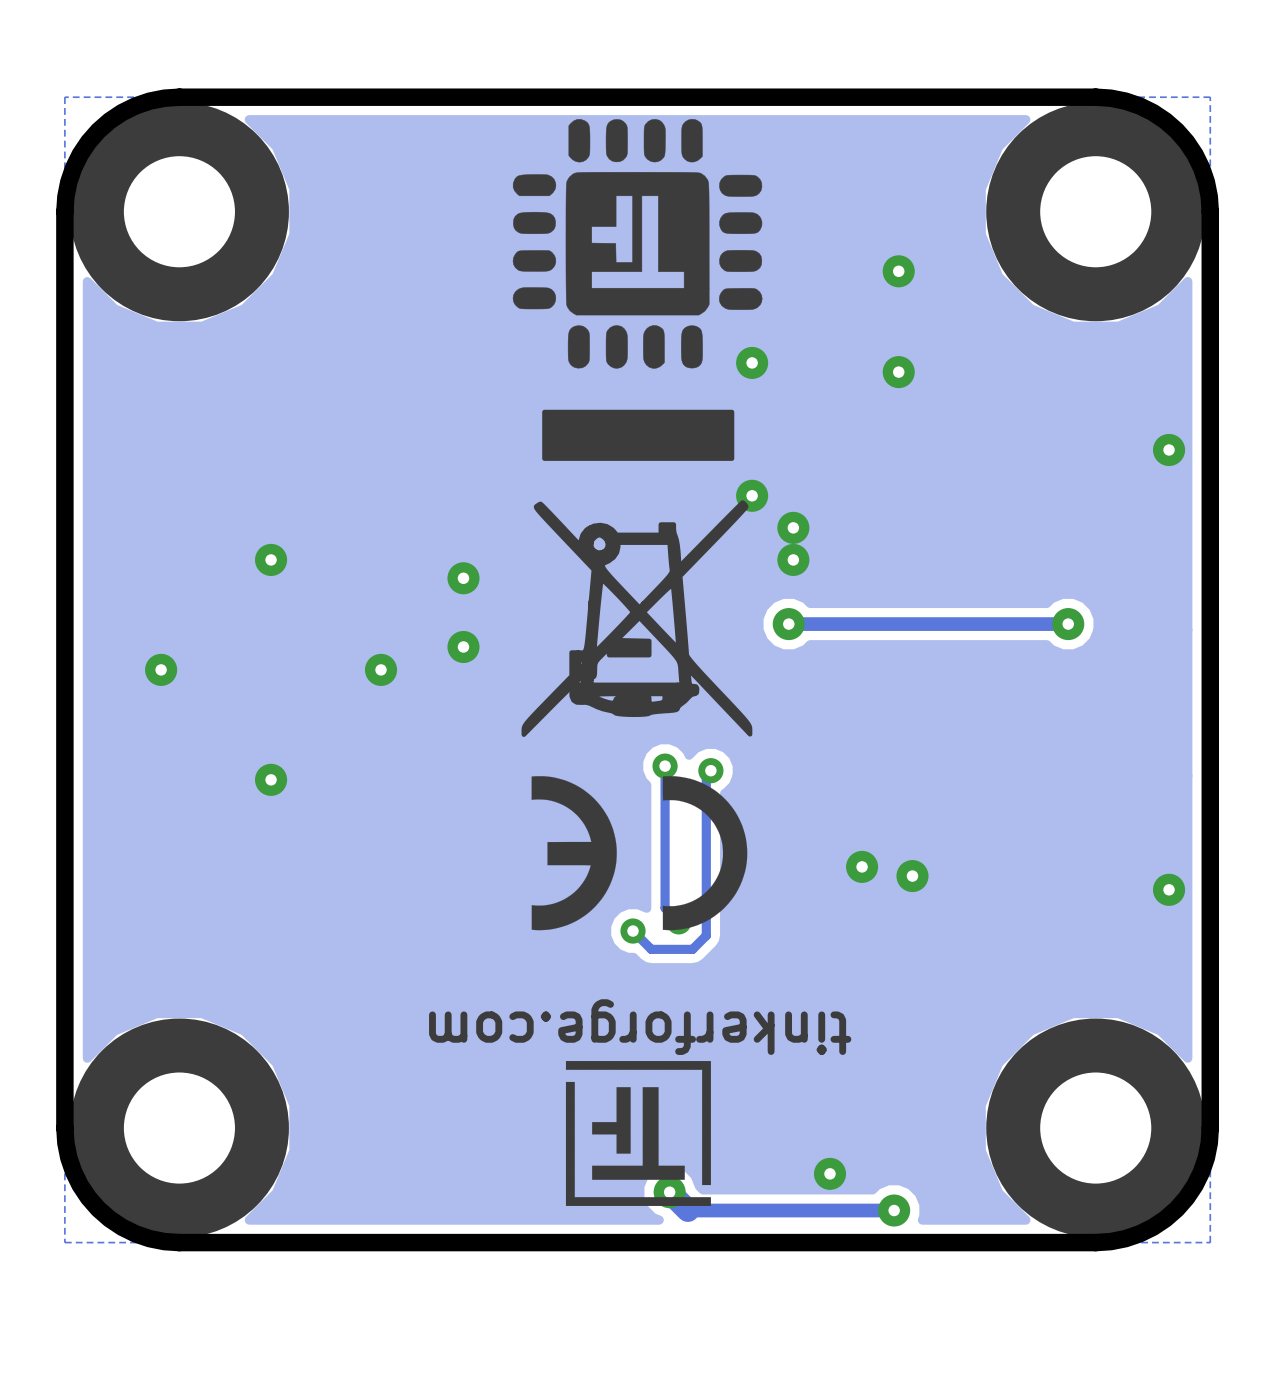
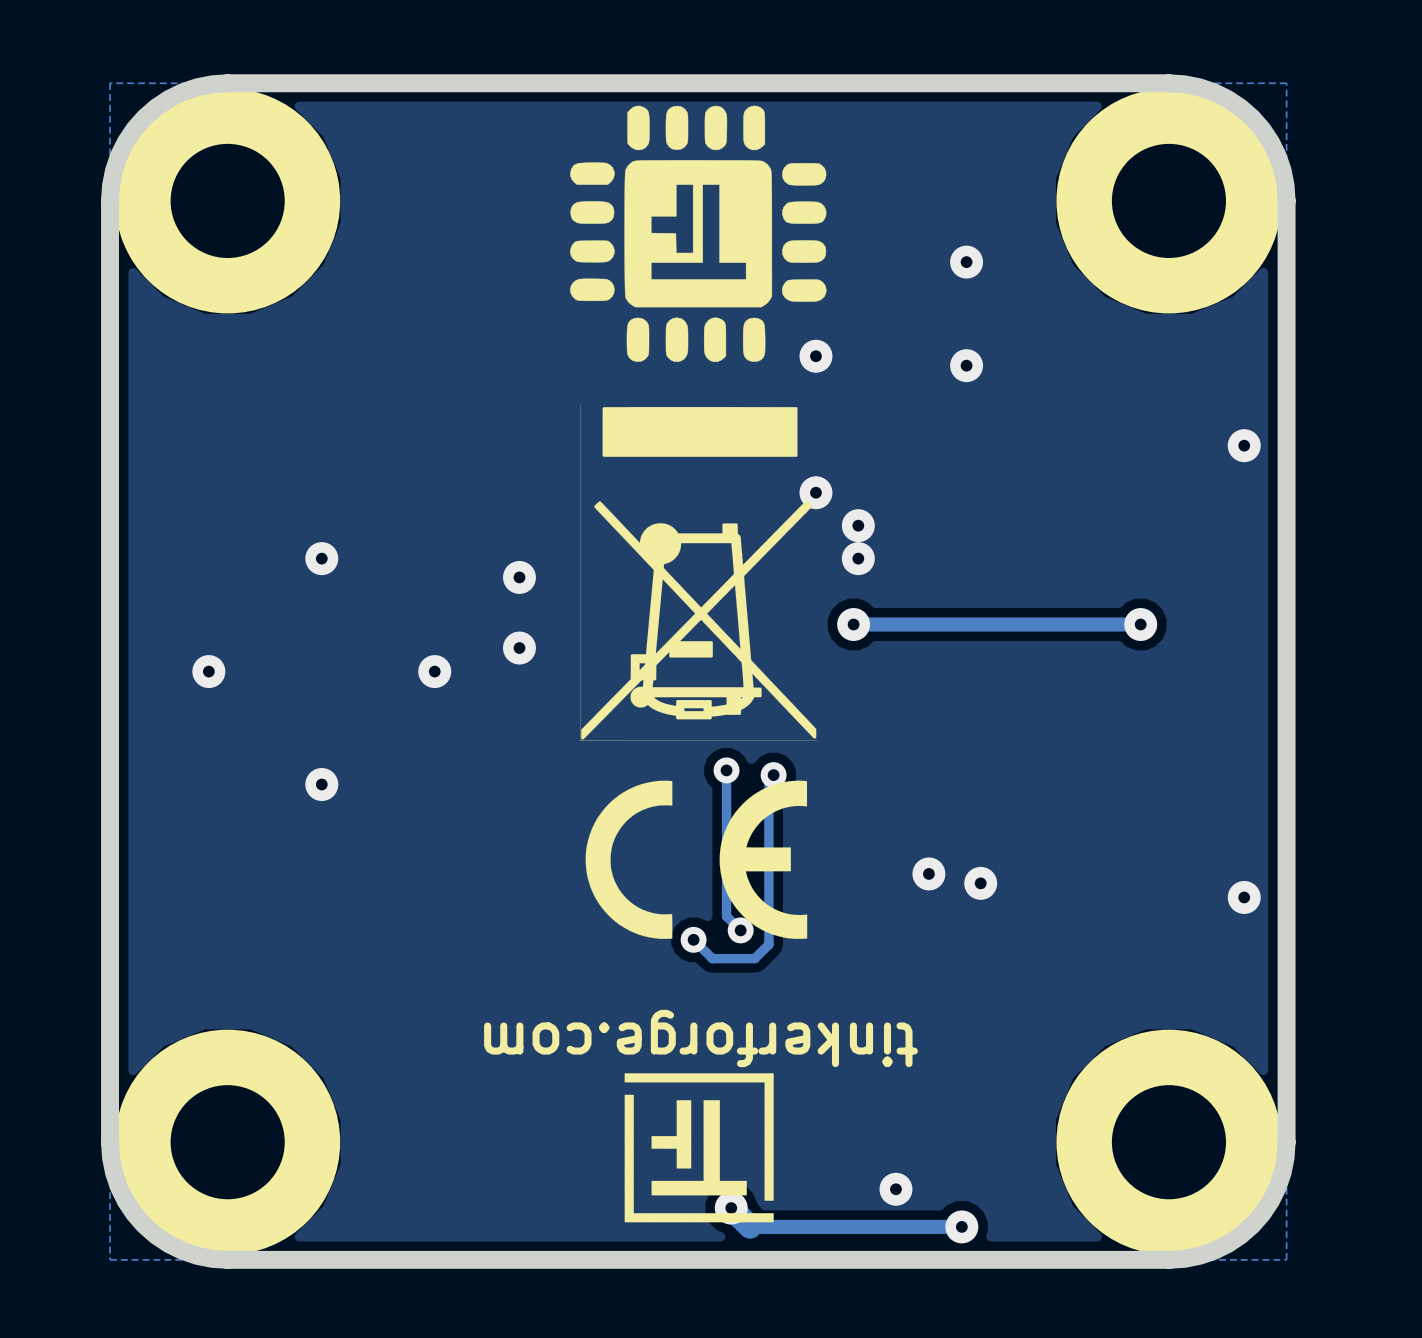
drawing shape: [521, 409, 753, 737] -> [580, 404, 817, 741]
drawing shape: [531, 776, 748, 931] -> [585, 780, 808, 939]

